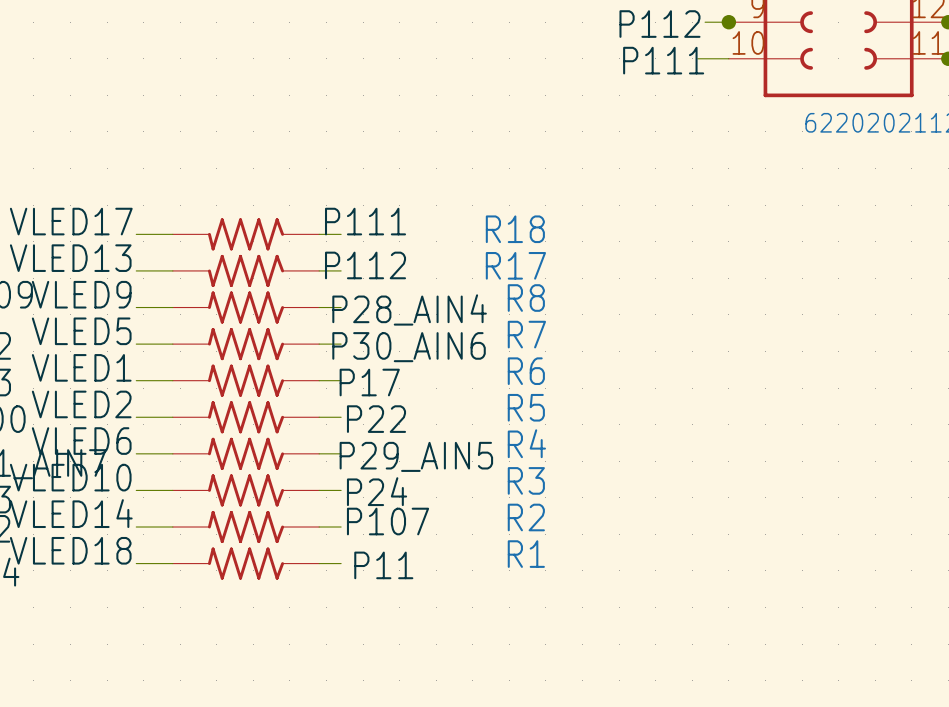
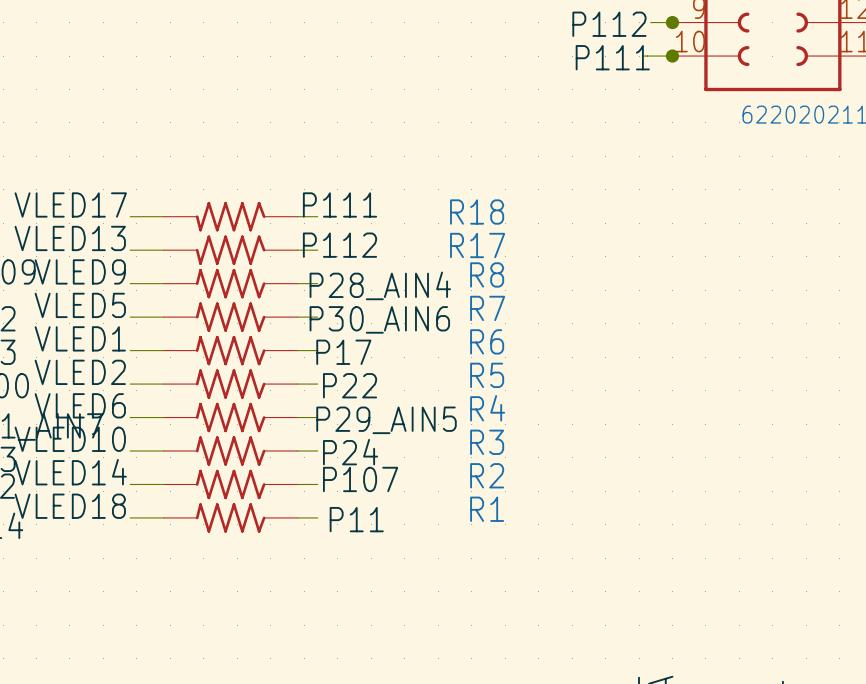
junction: none -> (672, 56)

